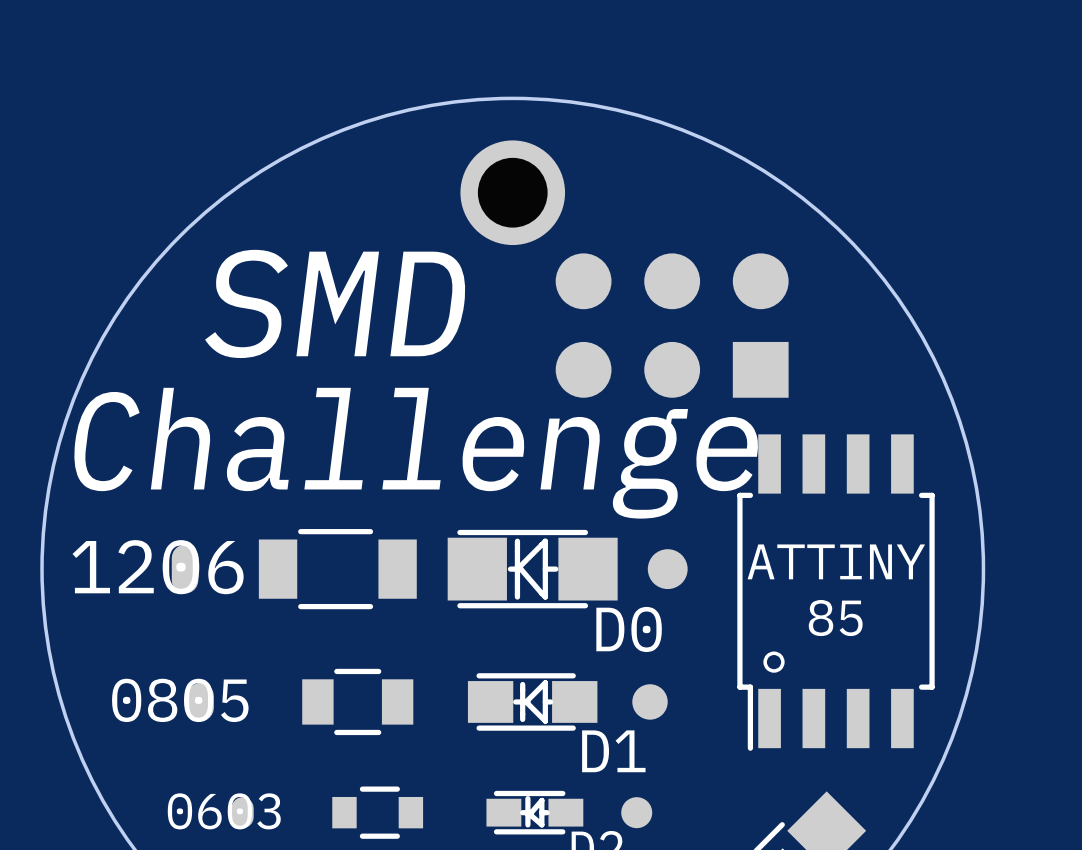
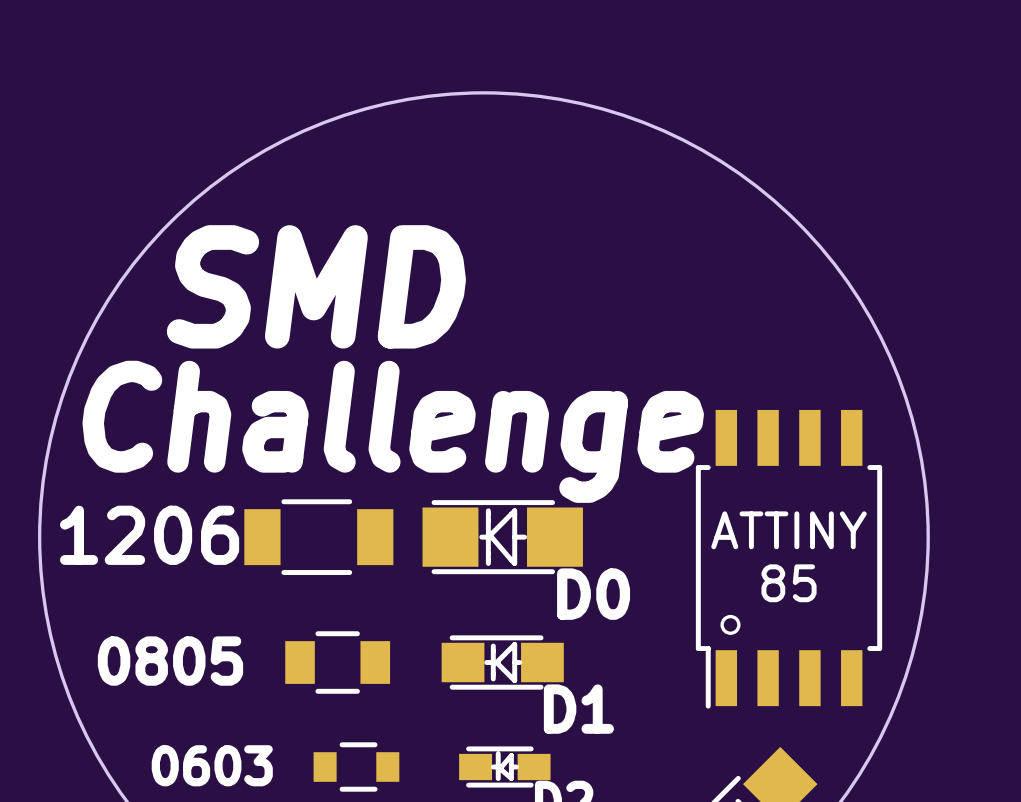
part: (512, 192) -> none
part: (672, 325) -> none
part: (185, 569) -> none
part: (667, 569) -> none
part: (200, 701) -> none
part: (650, 701) -> none
part: (242, 812) -> none
part: (636, 812) -> none

